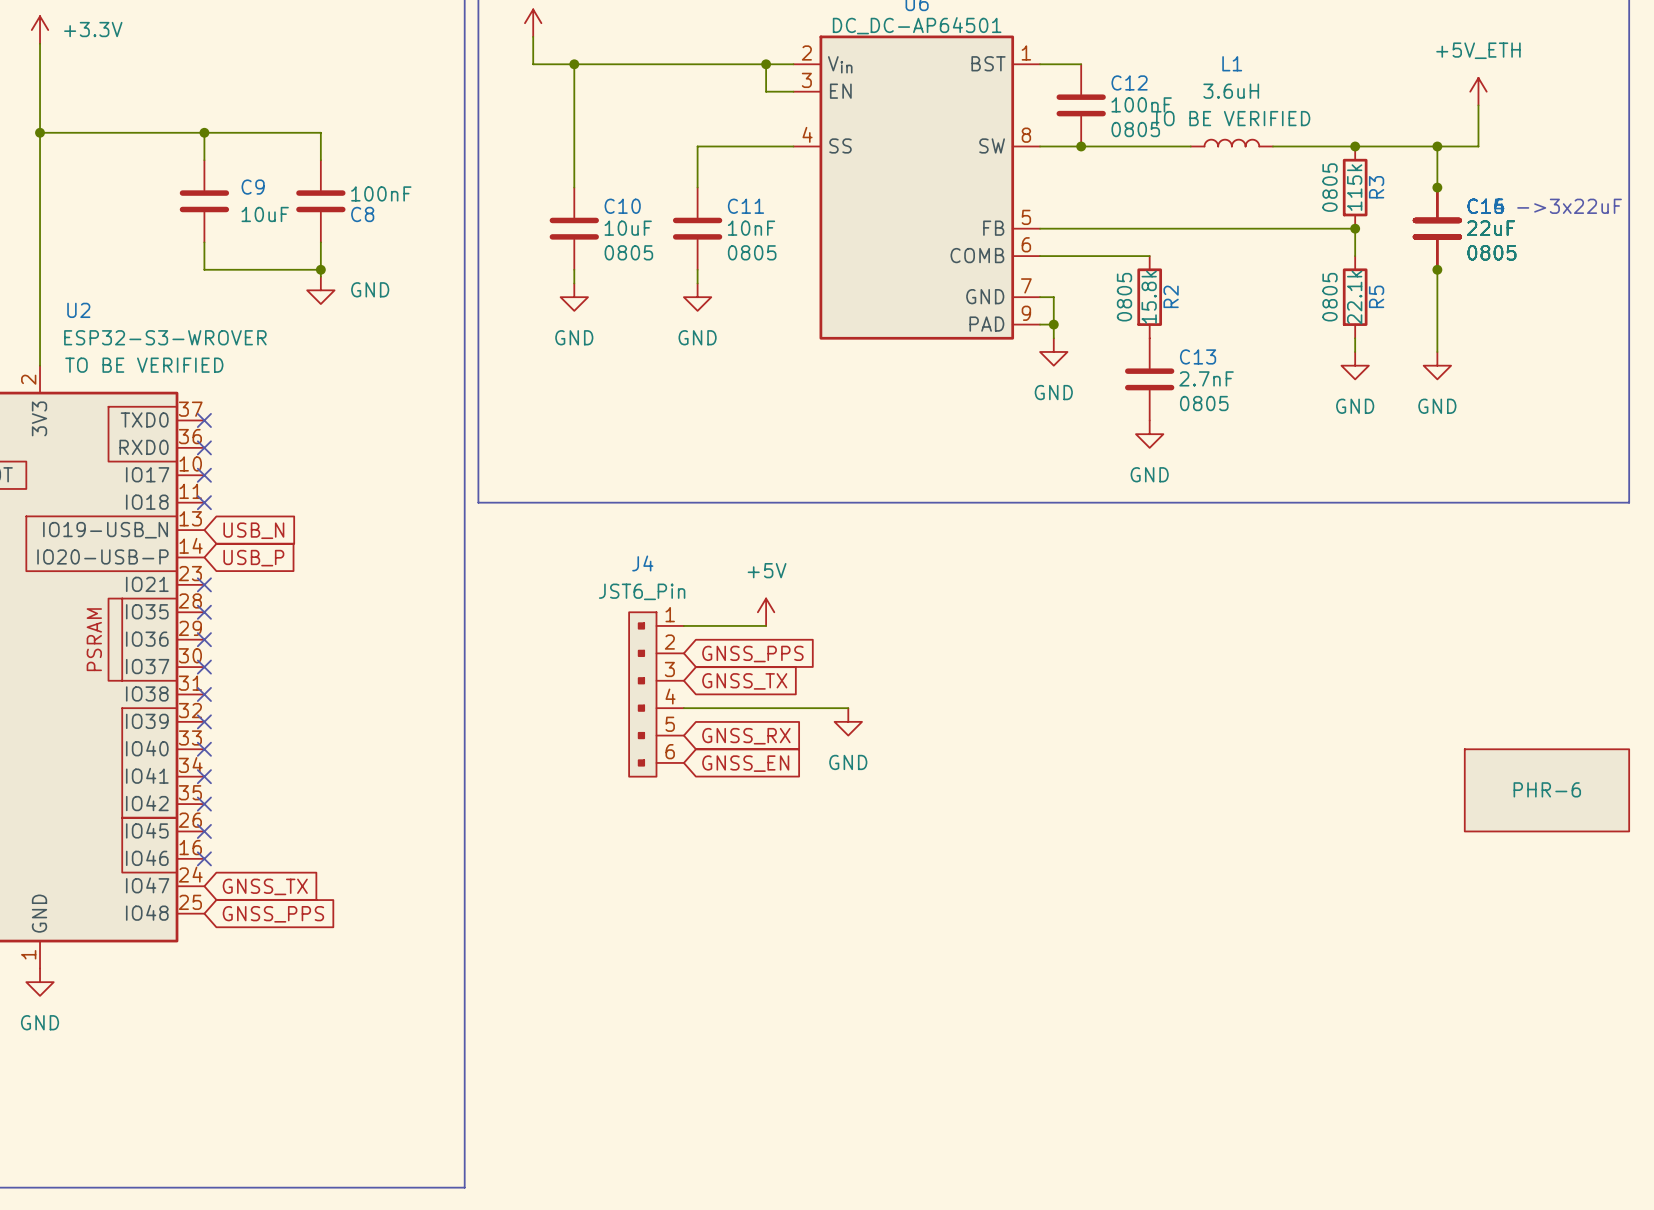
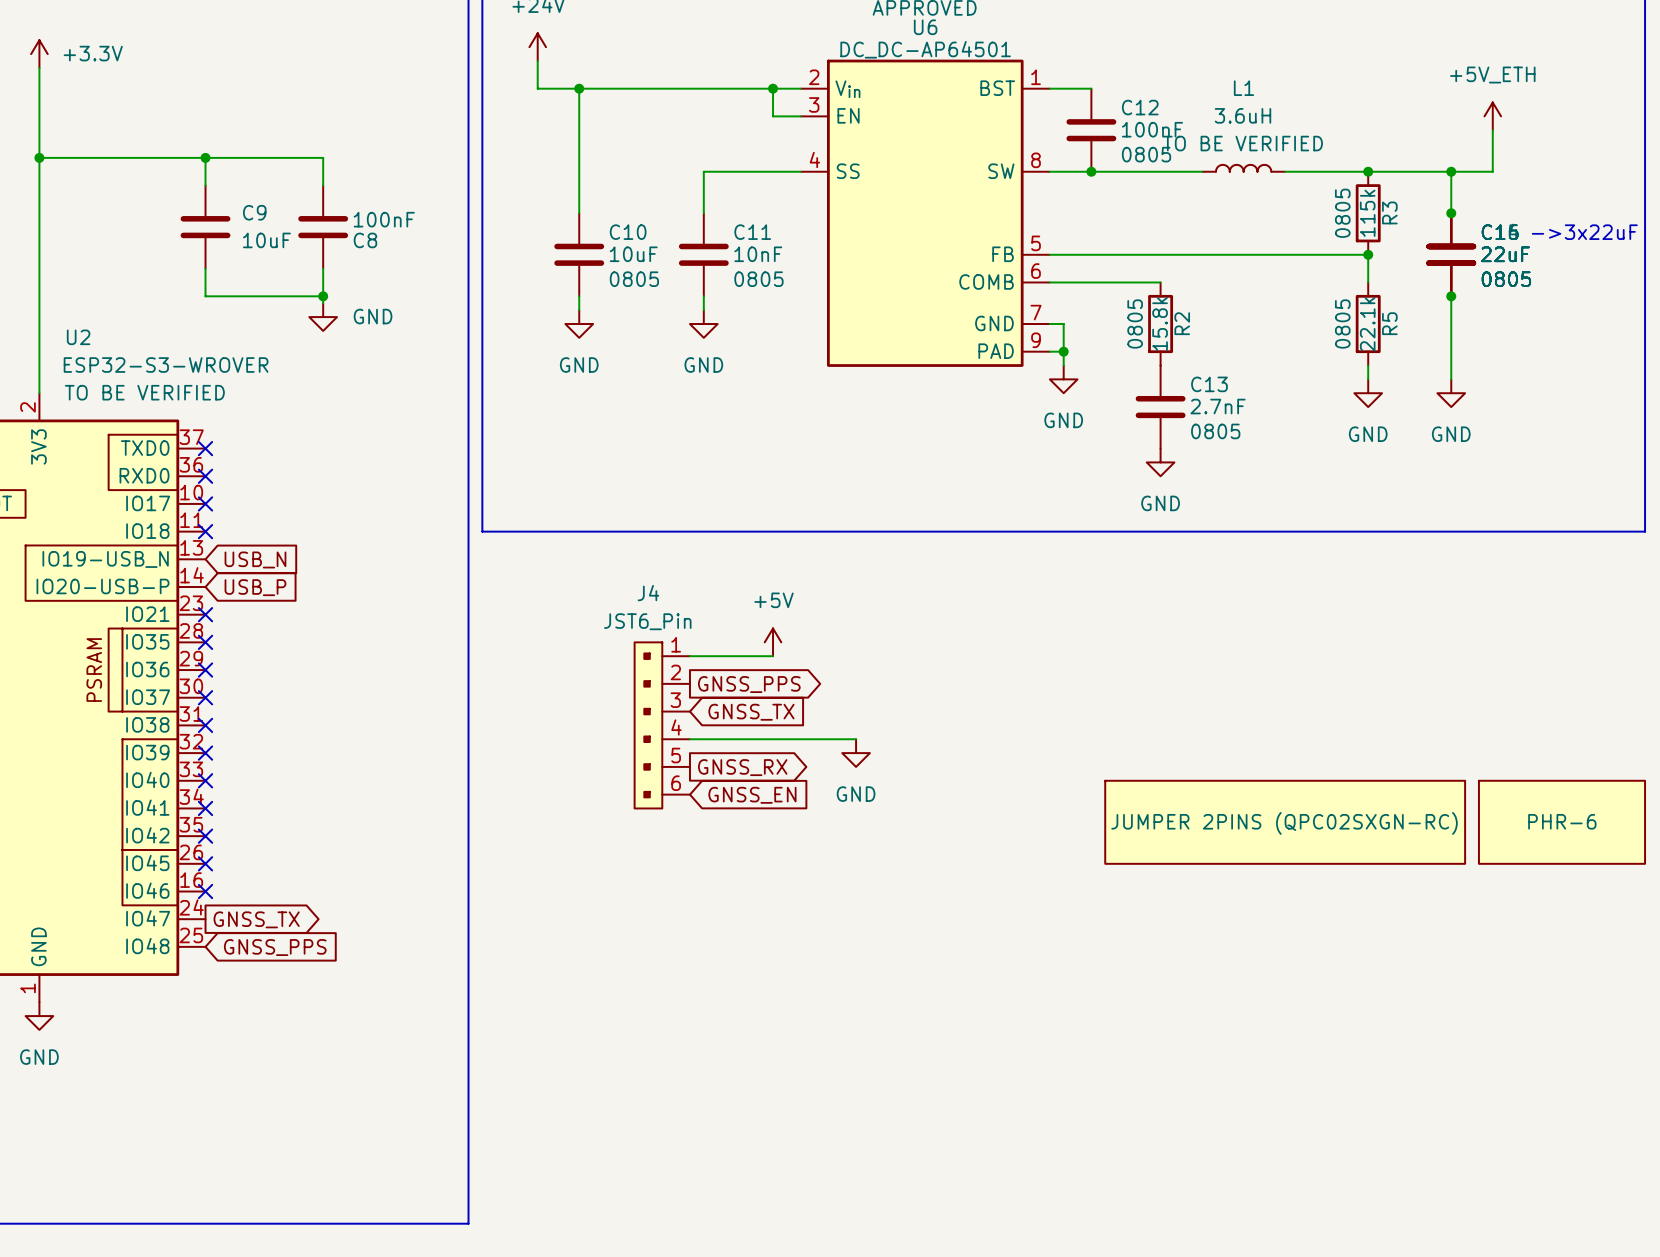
global label shape: input (752, 654) -> output (749, 684)
global label shape: input (746, 736) -> output (742, 767)
part: none -> JUMPER 2PINS (QPC02SXGN-RC) (1285, 822)
global label shape: input (265, 886) -> output (256, 919)

